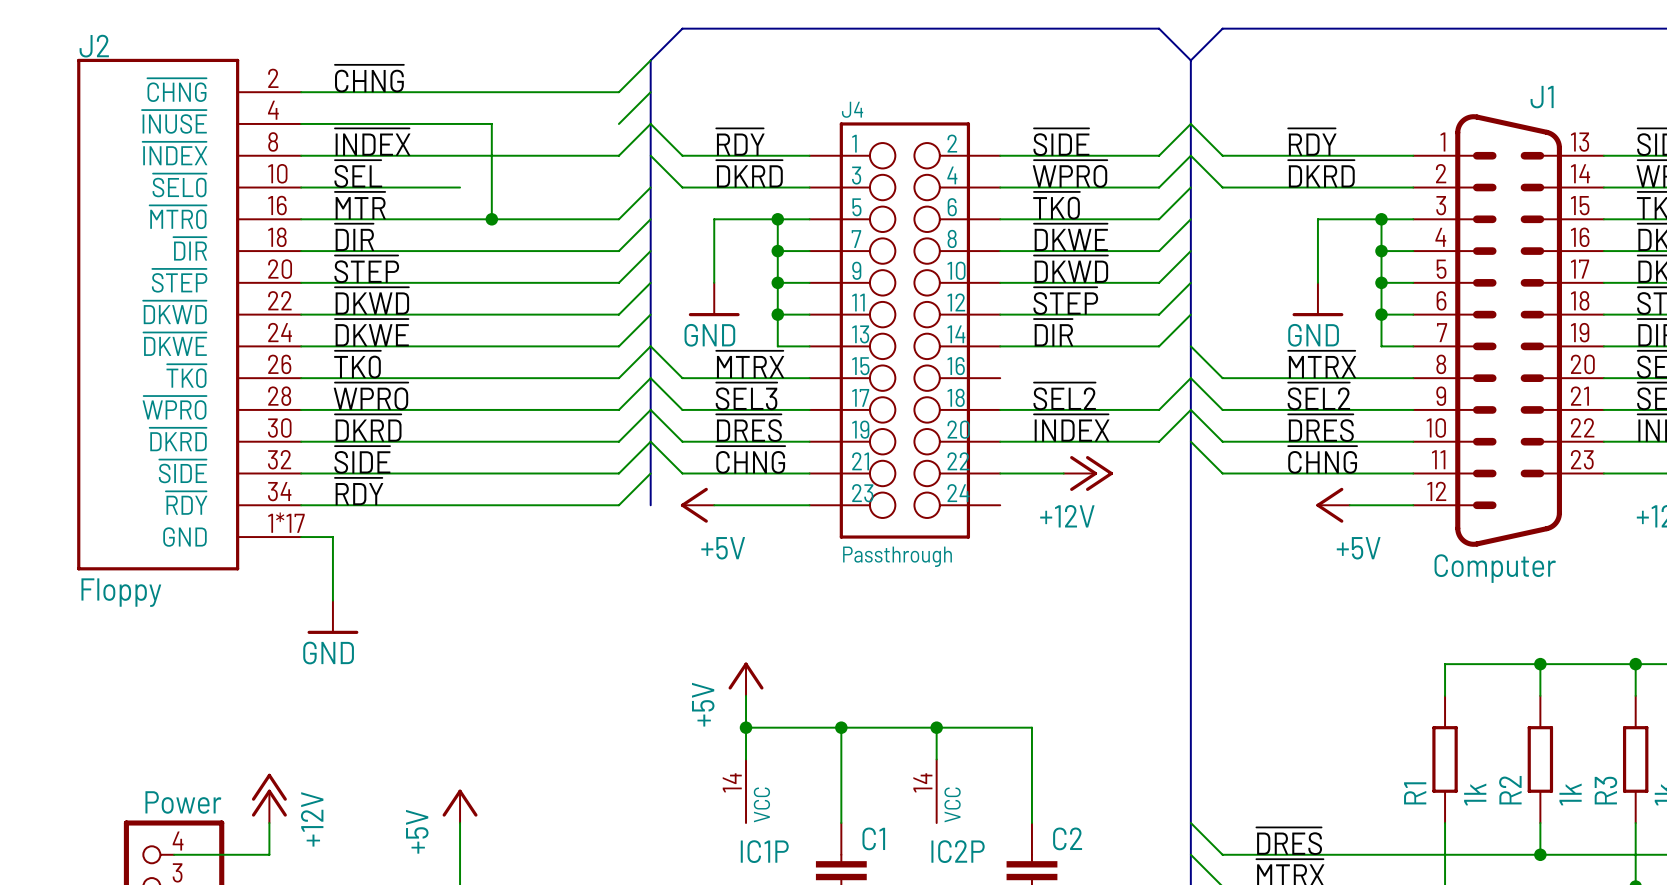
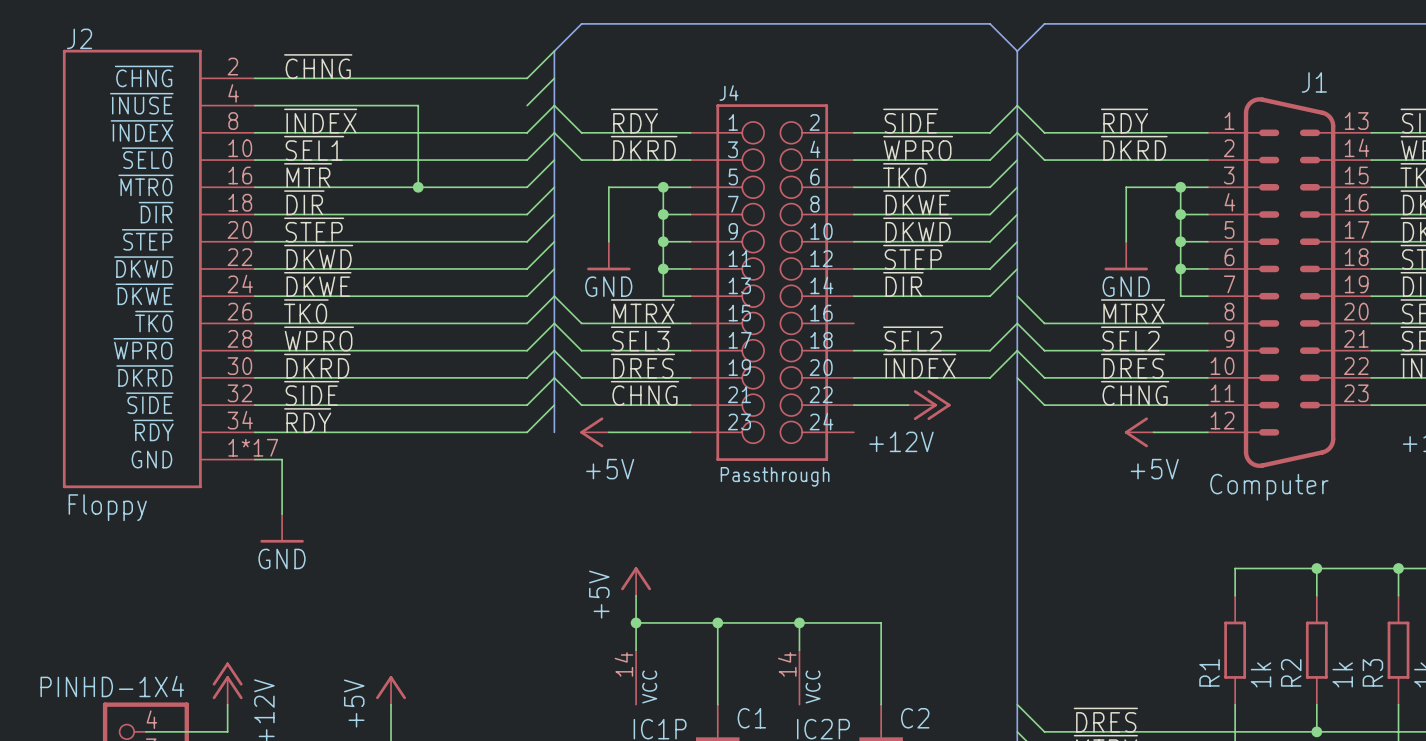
wire: none -> (554, 132) (527, 160) (391, 160)
label: ~{SEL} (358, 173) -> ~{SEL1} (314, 148)
part value: Power (183, 802) -> PINHD-1X4 (112, 686)

